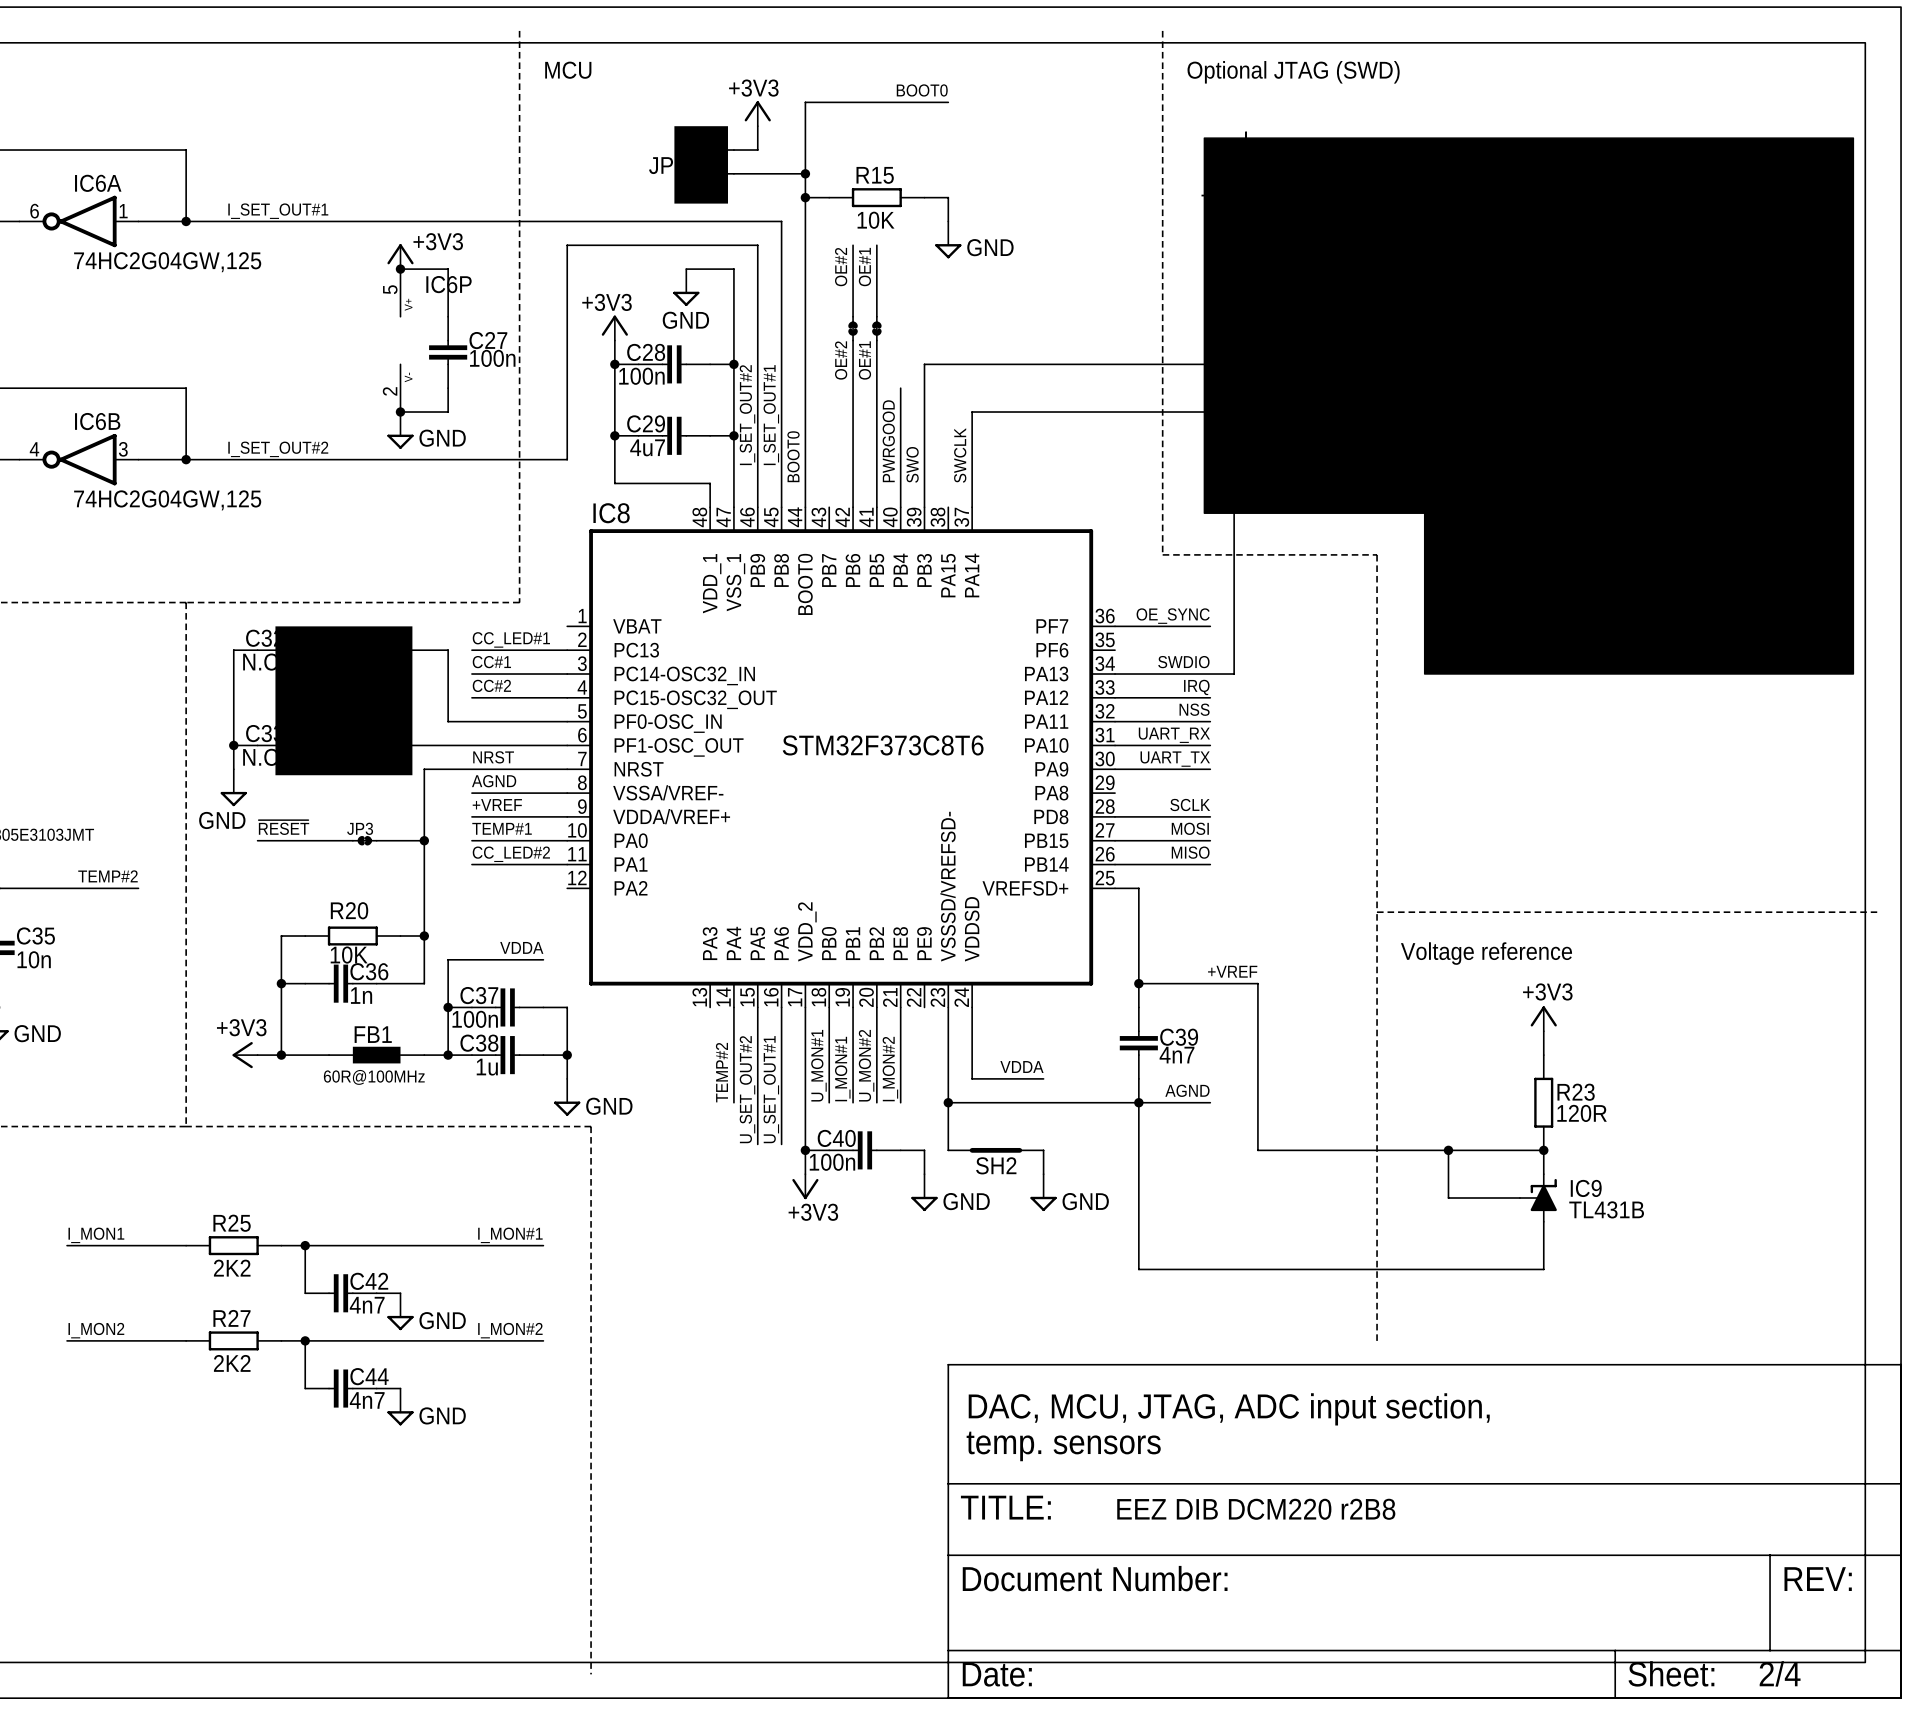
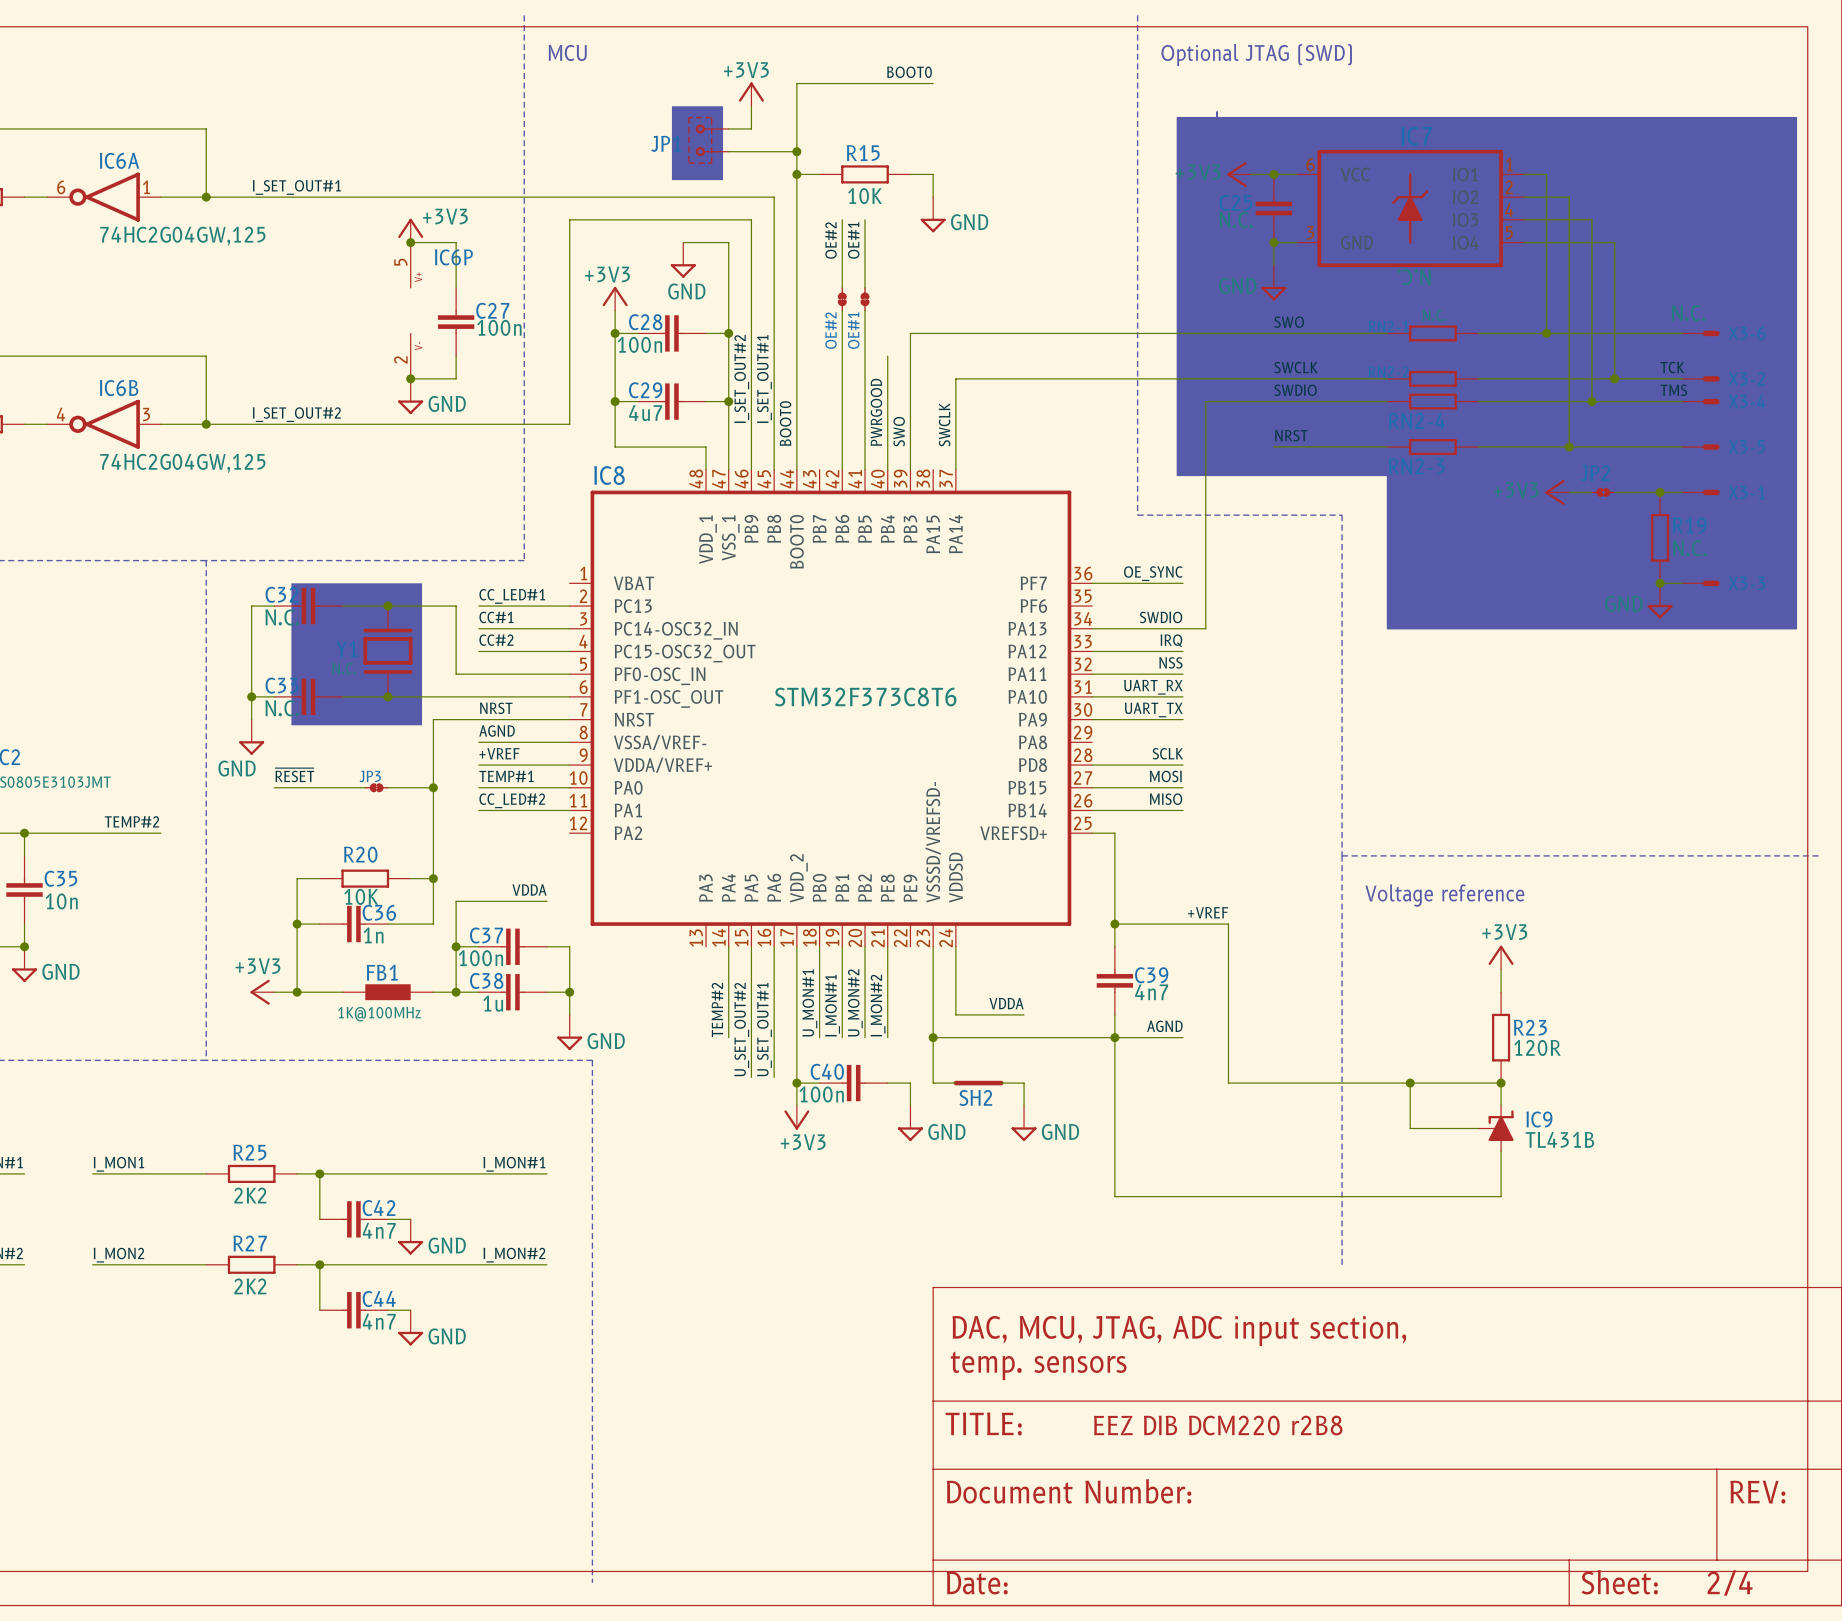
FB1 value: 60R@100MHz (374, 1077) -> 1K@100MHz (379, 1014)

